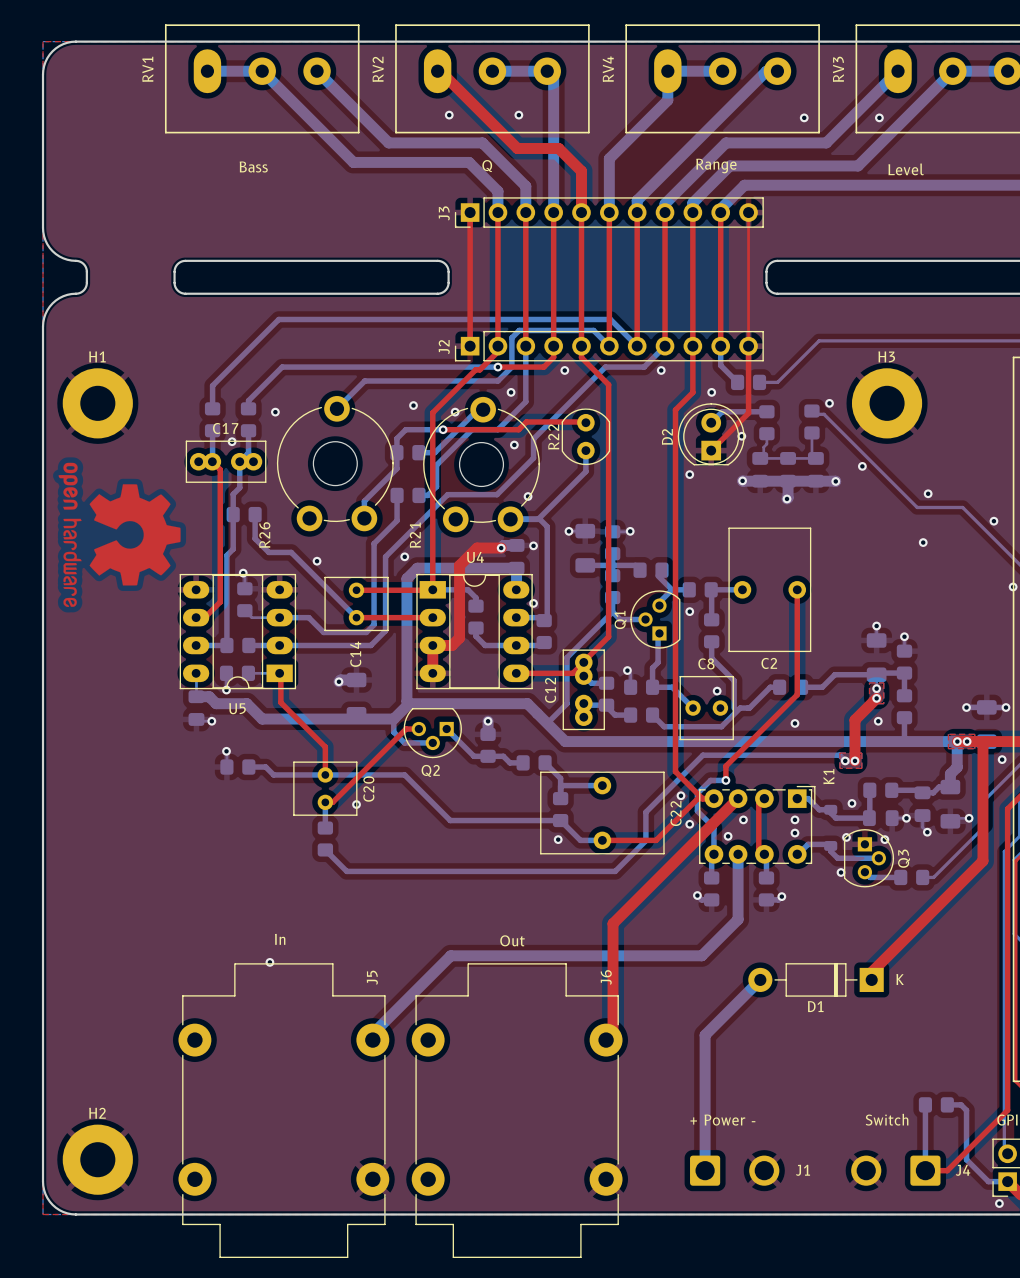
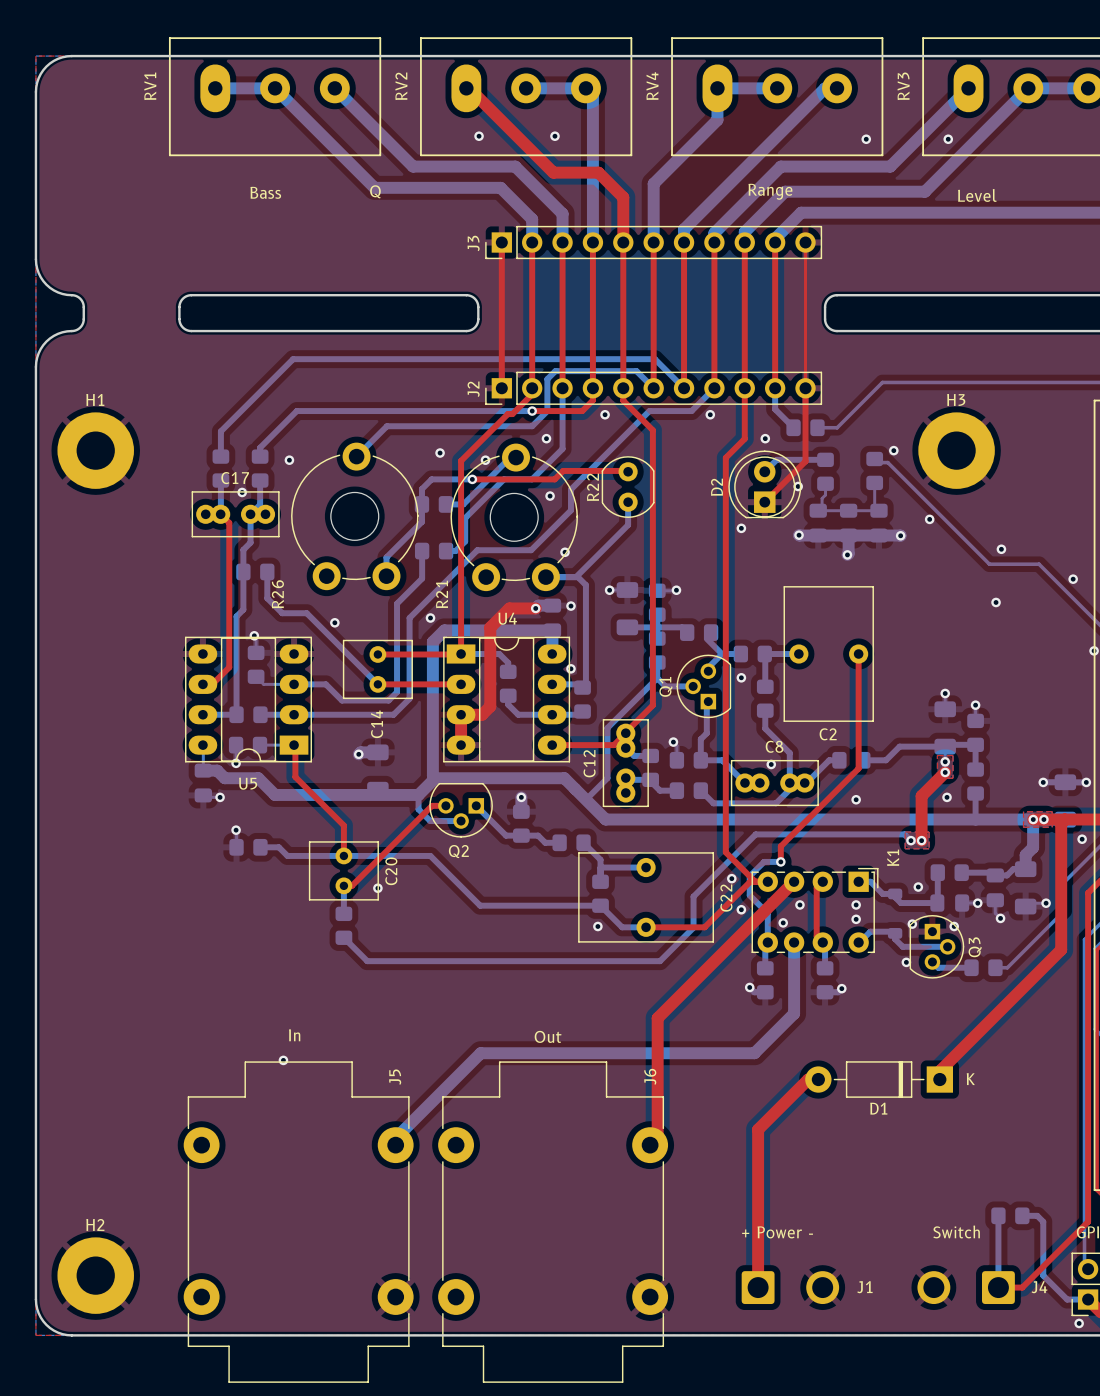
text position: Q (487, 166) -> Q (375, 191)
drawing: [58, 462, 181, 607] -> none
C8 footprint: [679, 675, 734, 741] -> [730, 759, 819, 807]
top track: none -> (818, 1079) (808, 1079) (758, 1129) (758, 1287)
bottom track: (760, 979) (705, 1035) (705, 1170) -> none

